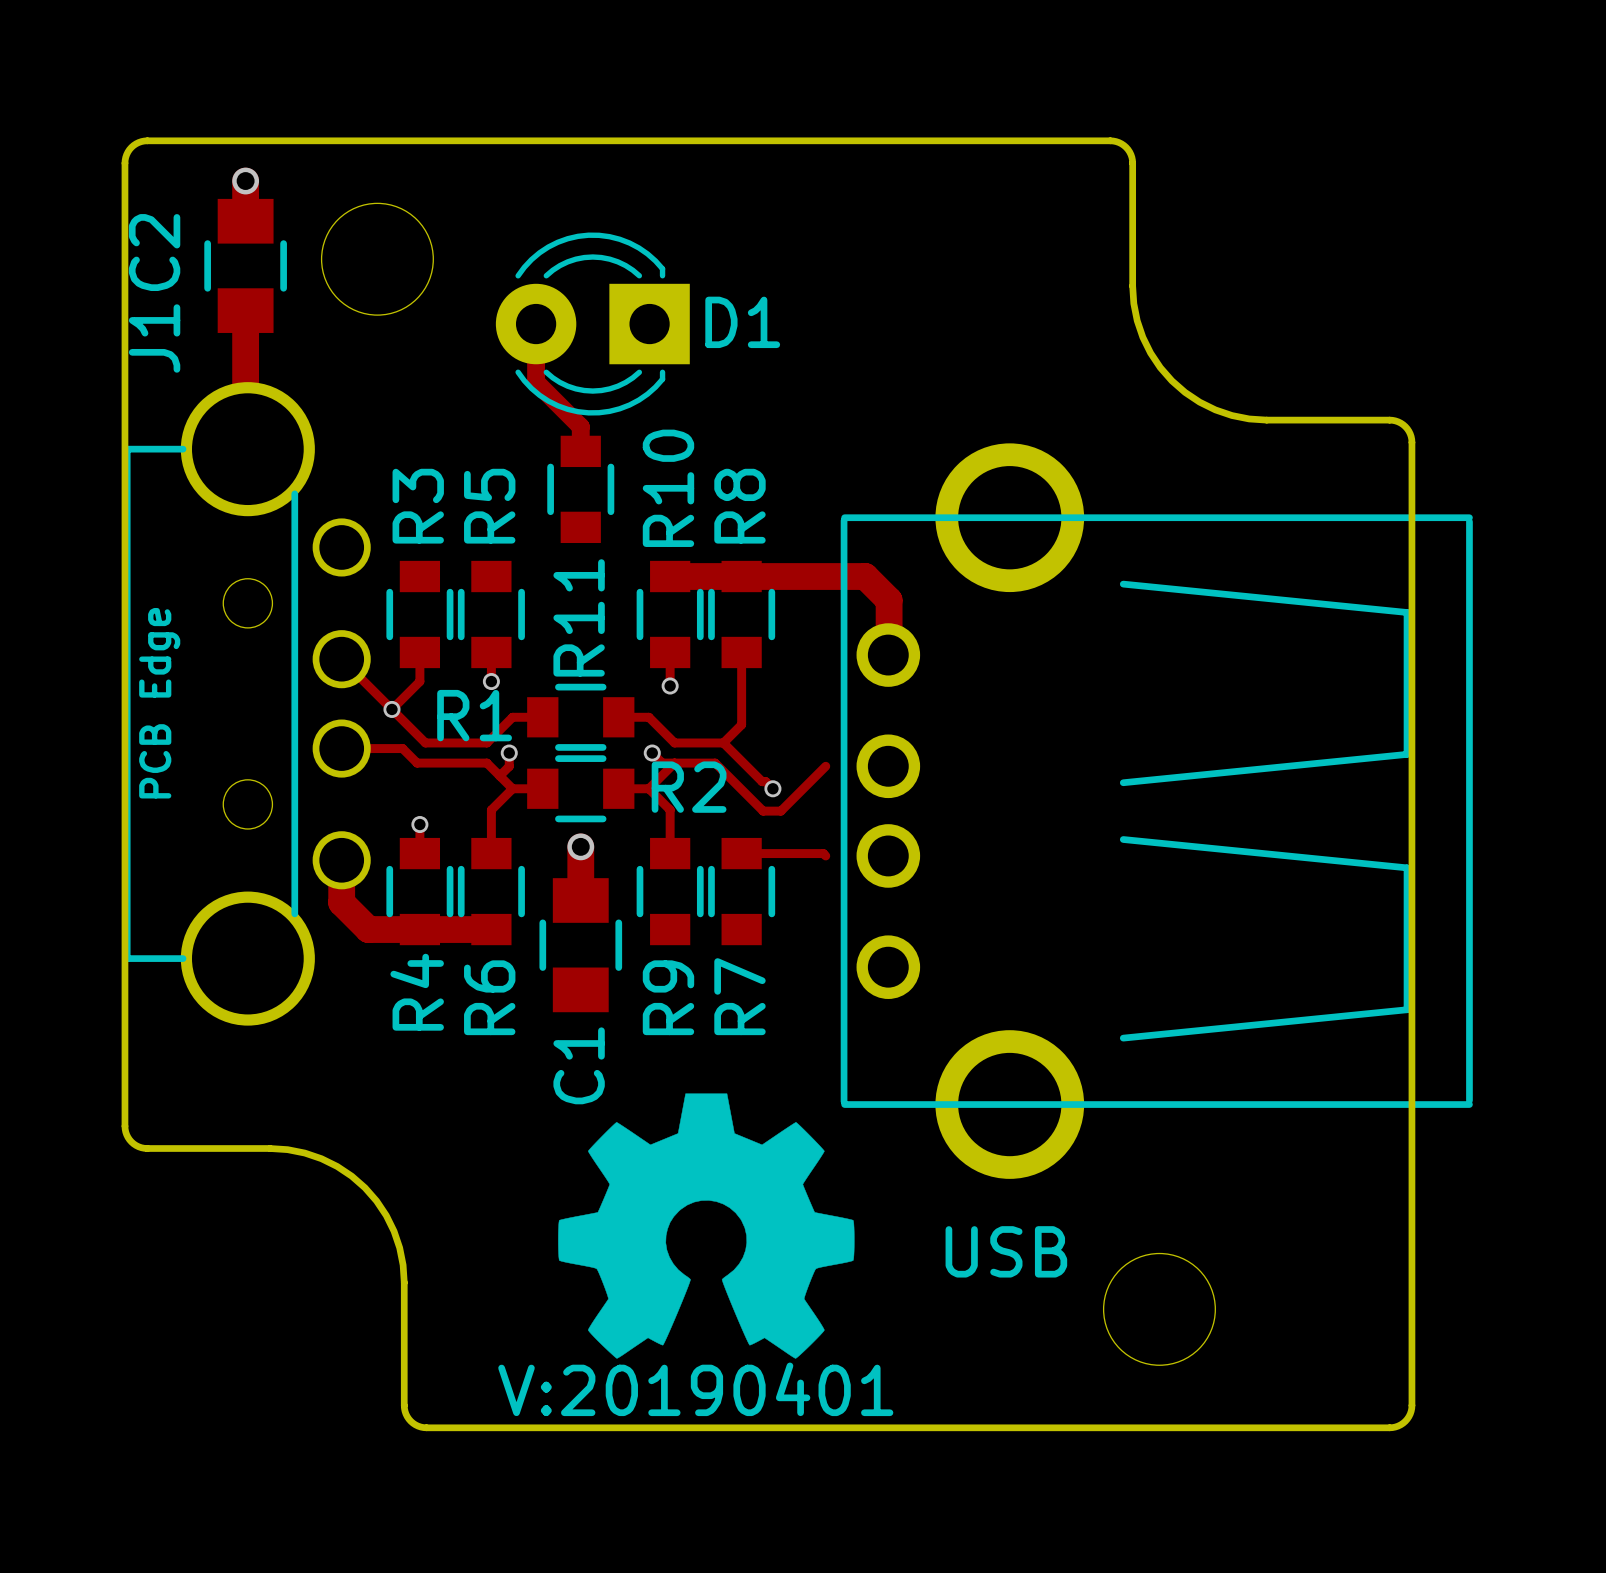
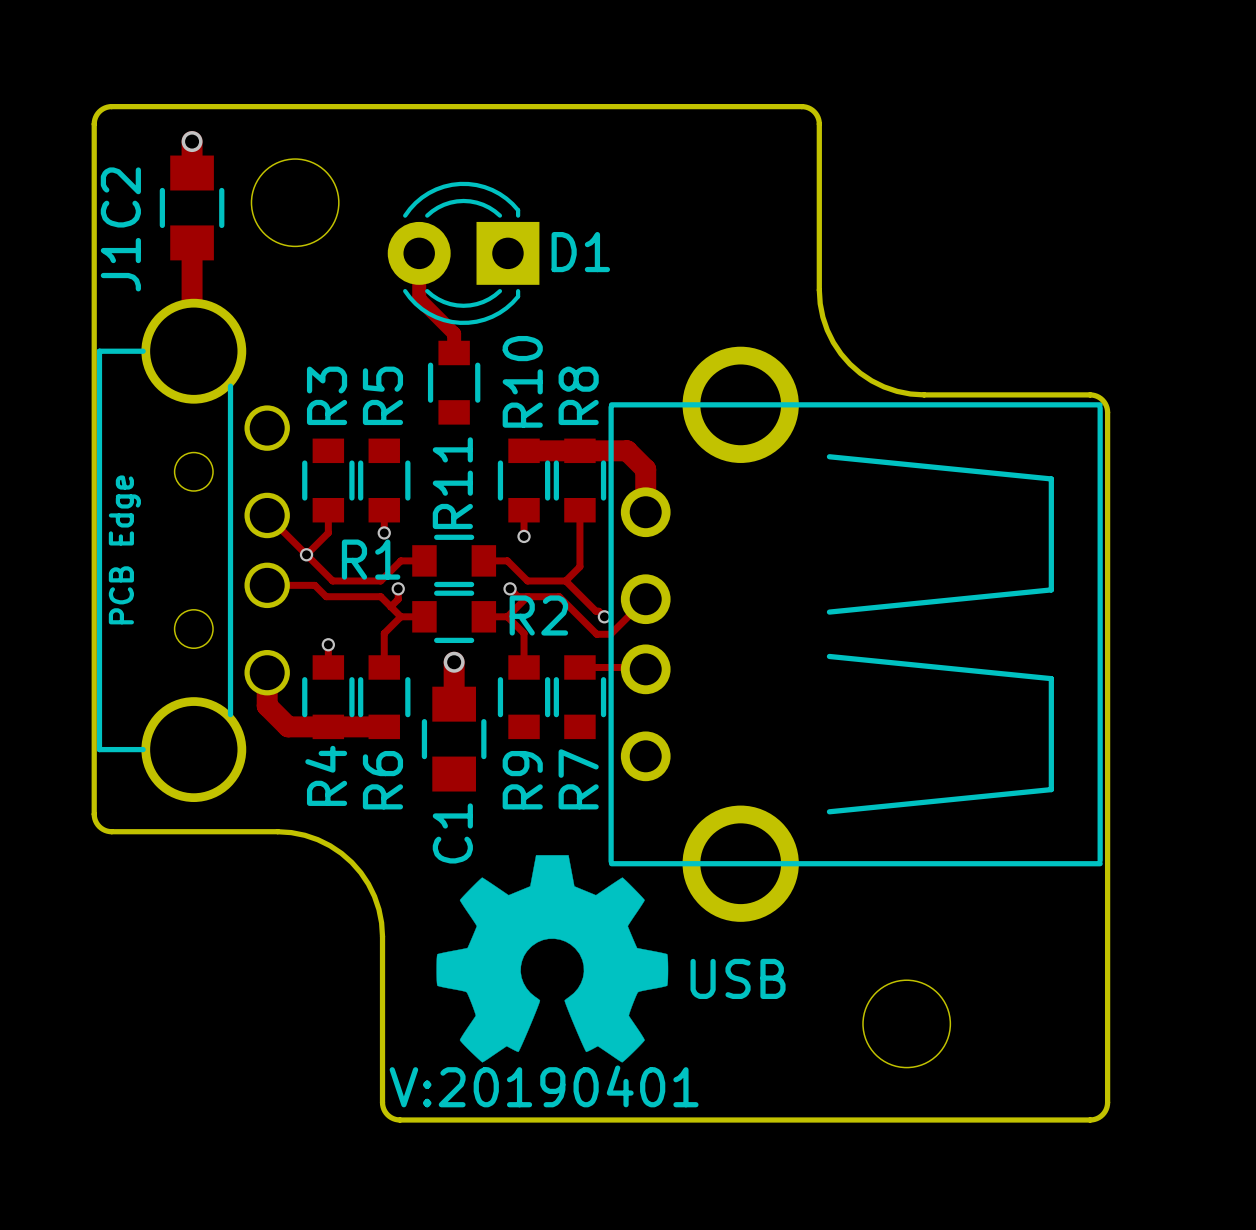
board edge: (147, 140) (1116, 141) (1126, 147) (1132, 160) (1132, 286) (1137, 320) (1150, 353) (1171, 380) (1199, 402) (1232, 415) (1249, 418) (1389, 420) (1398, 421) (1405, 426) (1410, 433) (1411, 442) (1411, 1405) (1410, 1414) (1405, 1421) (1398, 1426) (1389, 1427) (420, 1427) (410, 1421) (404, 1408) (404, 1282) (399, 1247) (386, 1215) (364, 1187) (337, 1166) (304, 1153) (287, 1149) (147, 1148) (138, 1146) (131, 1141) (126, 1134) (124, 1126) (124, 163) (126, 154) (131, 147) (138, 142) (147, 140) -> (111, 106) (99, 111) (94, 124) (94, 814) (99, 826) (111, 831) (291, 832) (304, 835) (330, 845) (351, 862) (360, 872) (374, 896) (381, 922) (382, 1104) (387, 1114) (395, 1119) (1090, 1120) (1102, 1114) (1107, 1102) (1107, 412) (1102, 400) (1090, 394) (910, 394) (897, 391) (871, 380) (850, 364) (840, 353) (827, 330) (820, 303) (819, 121) (814, 111) (806, 107) (111, 106)
track: (801, 576) (865, 576) (889, 600) (889, 655) -> (627, 450) (645, 469) (645, 512)
part position: (1156, 811) -> (855, 634)

